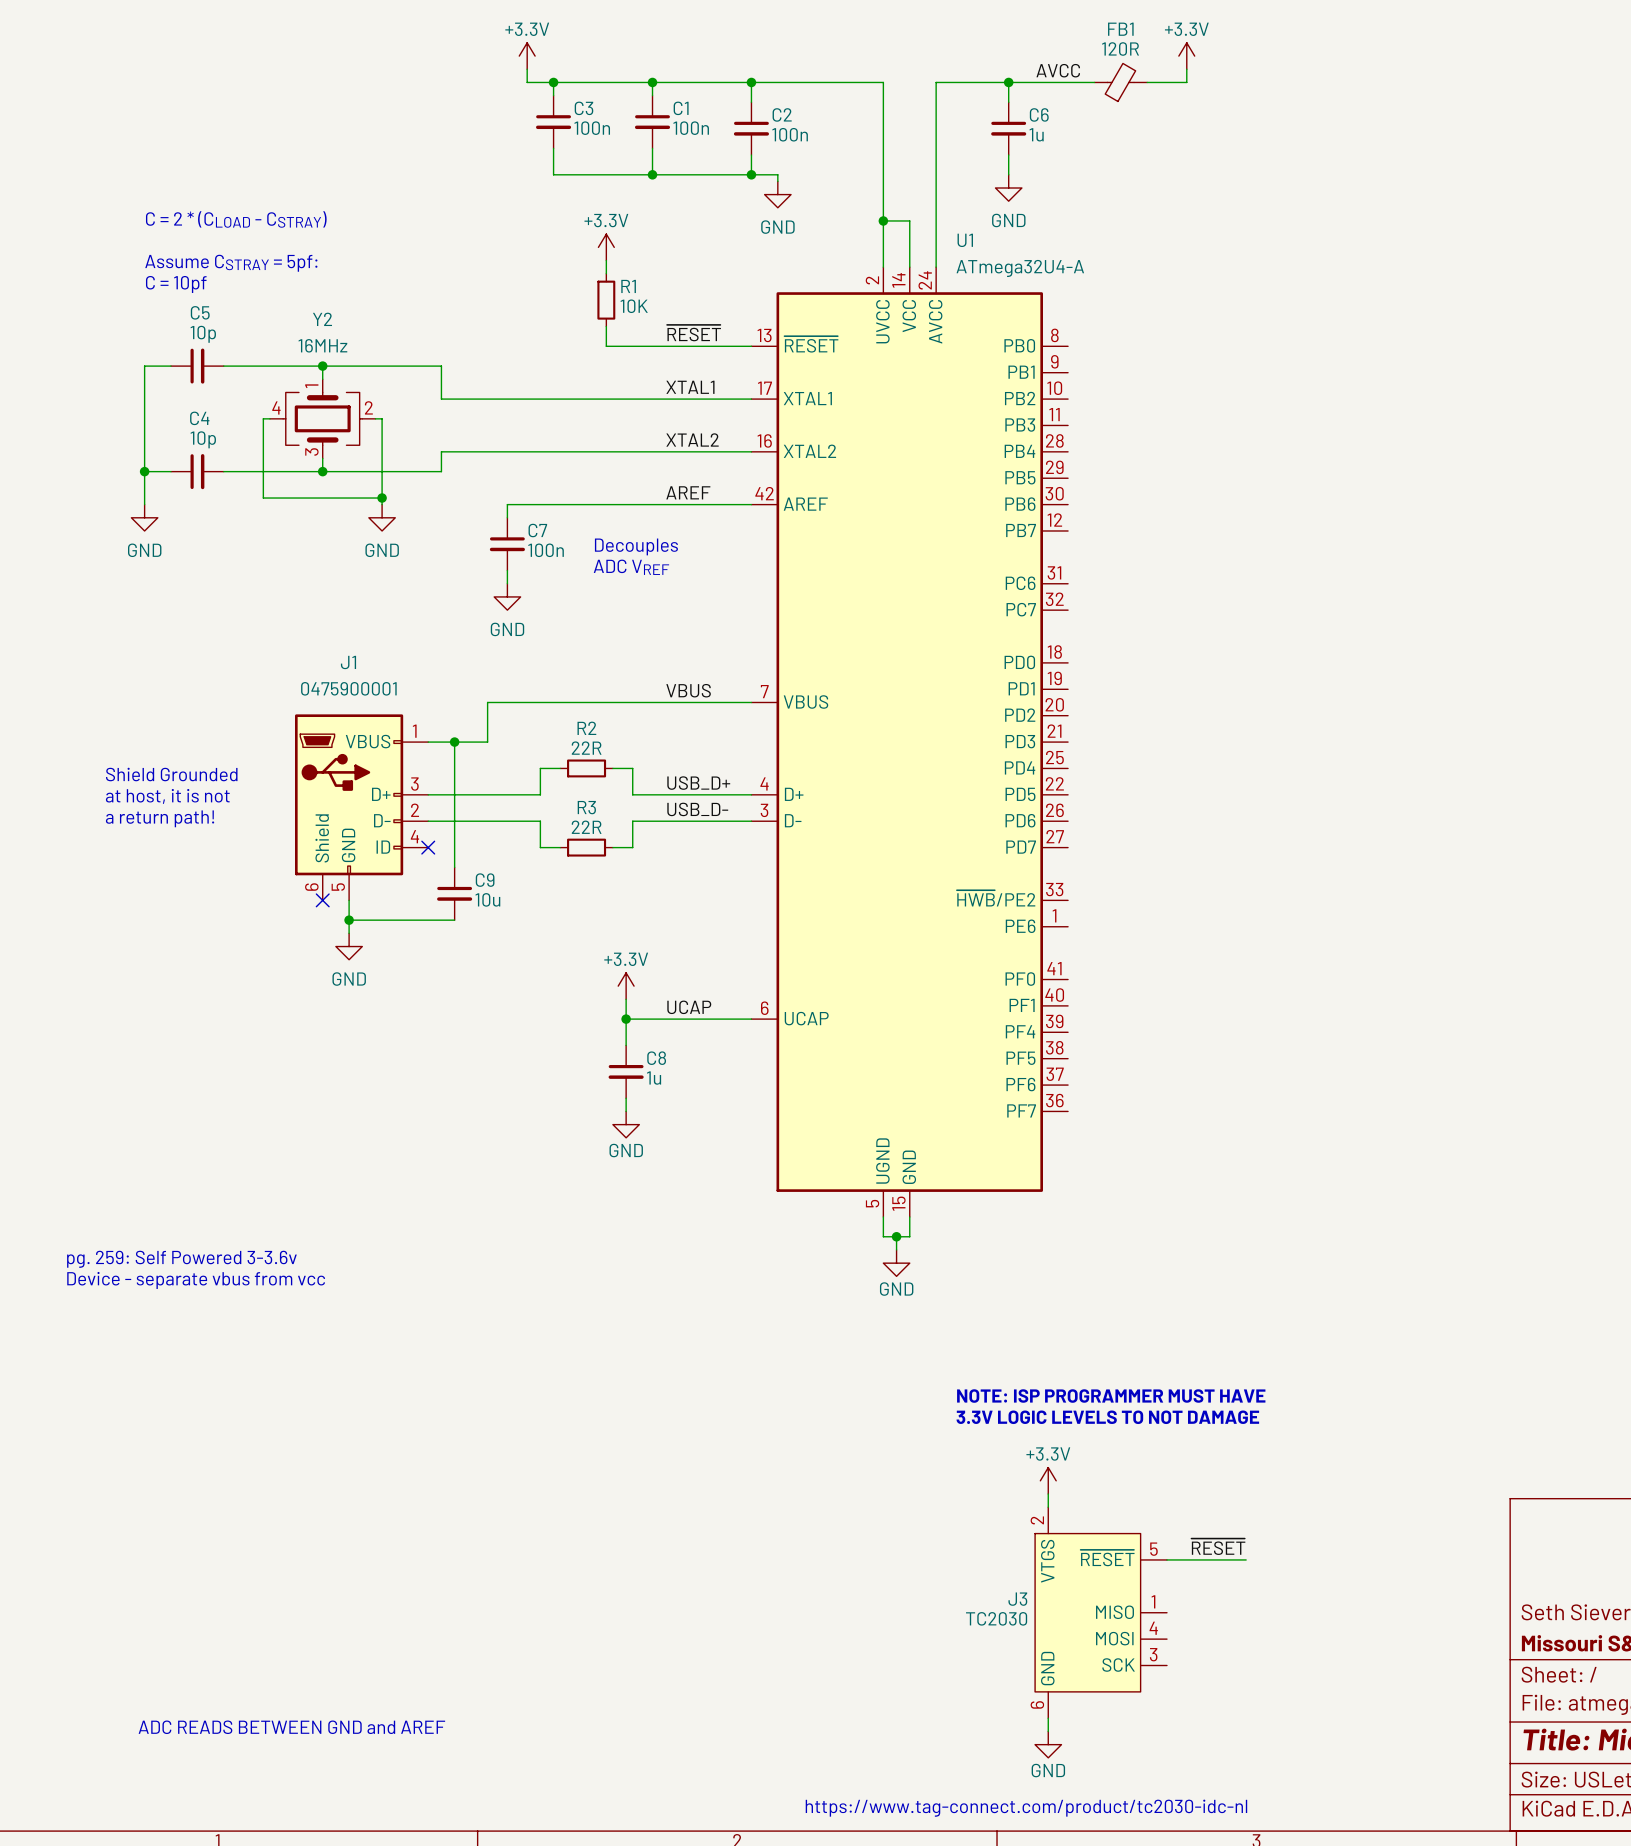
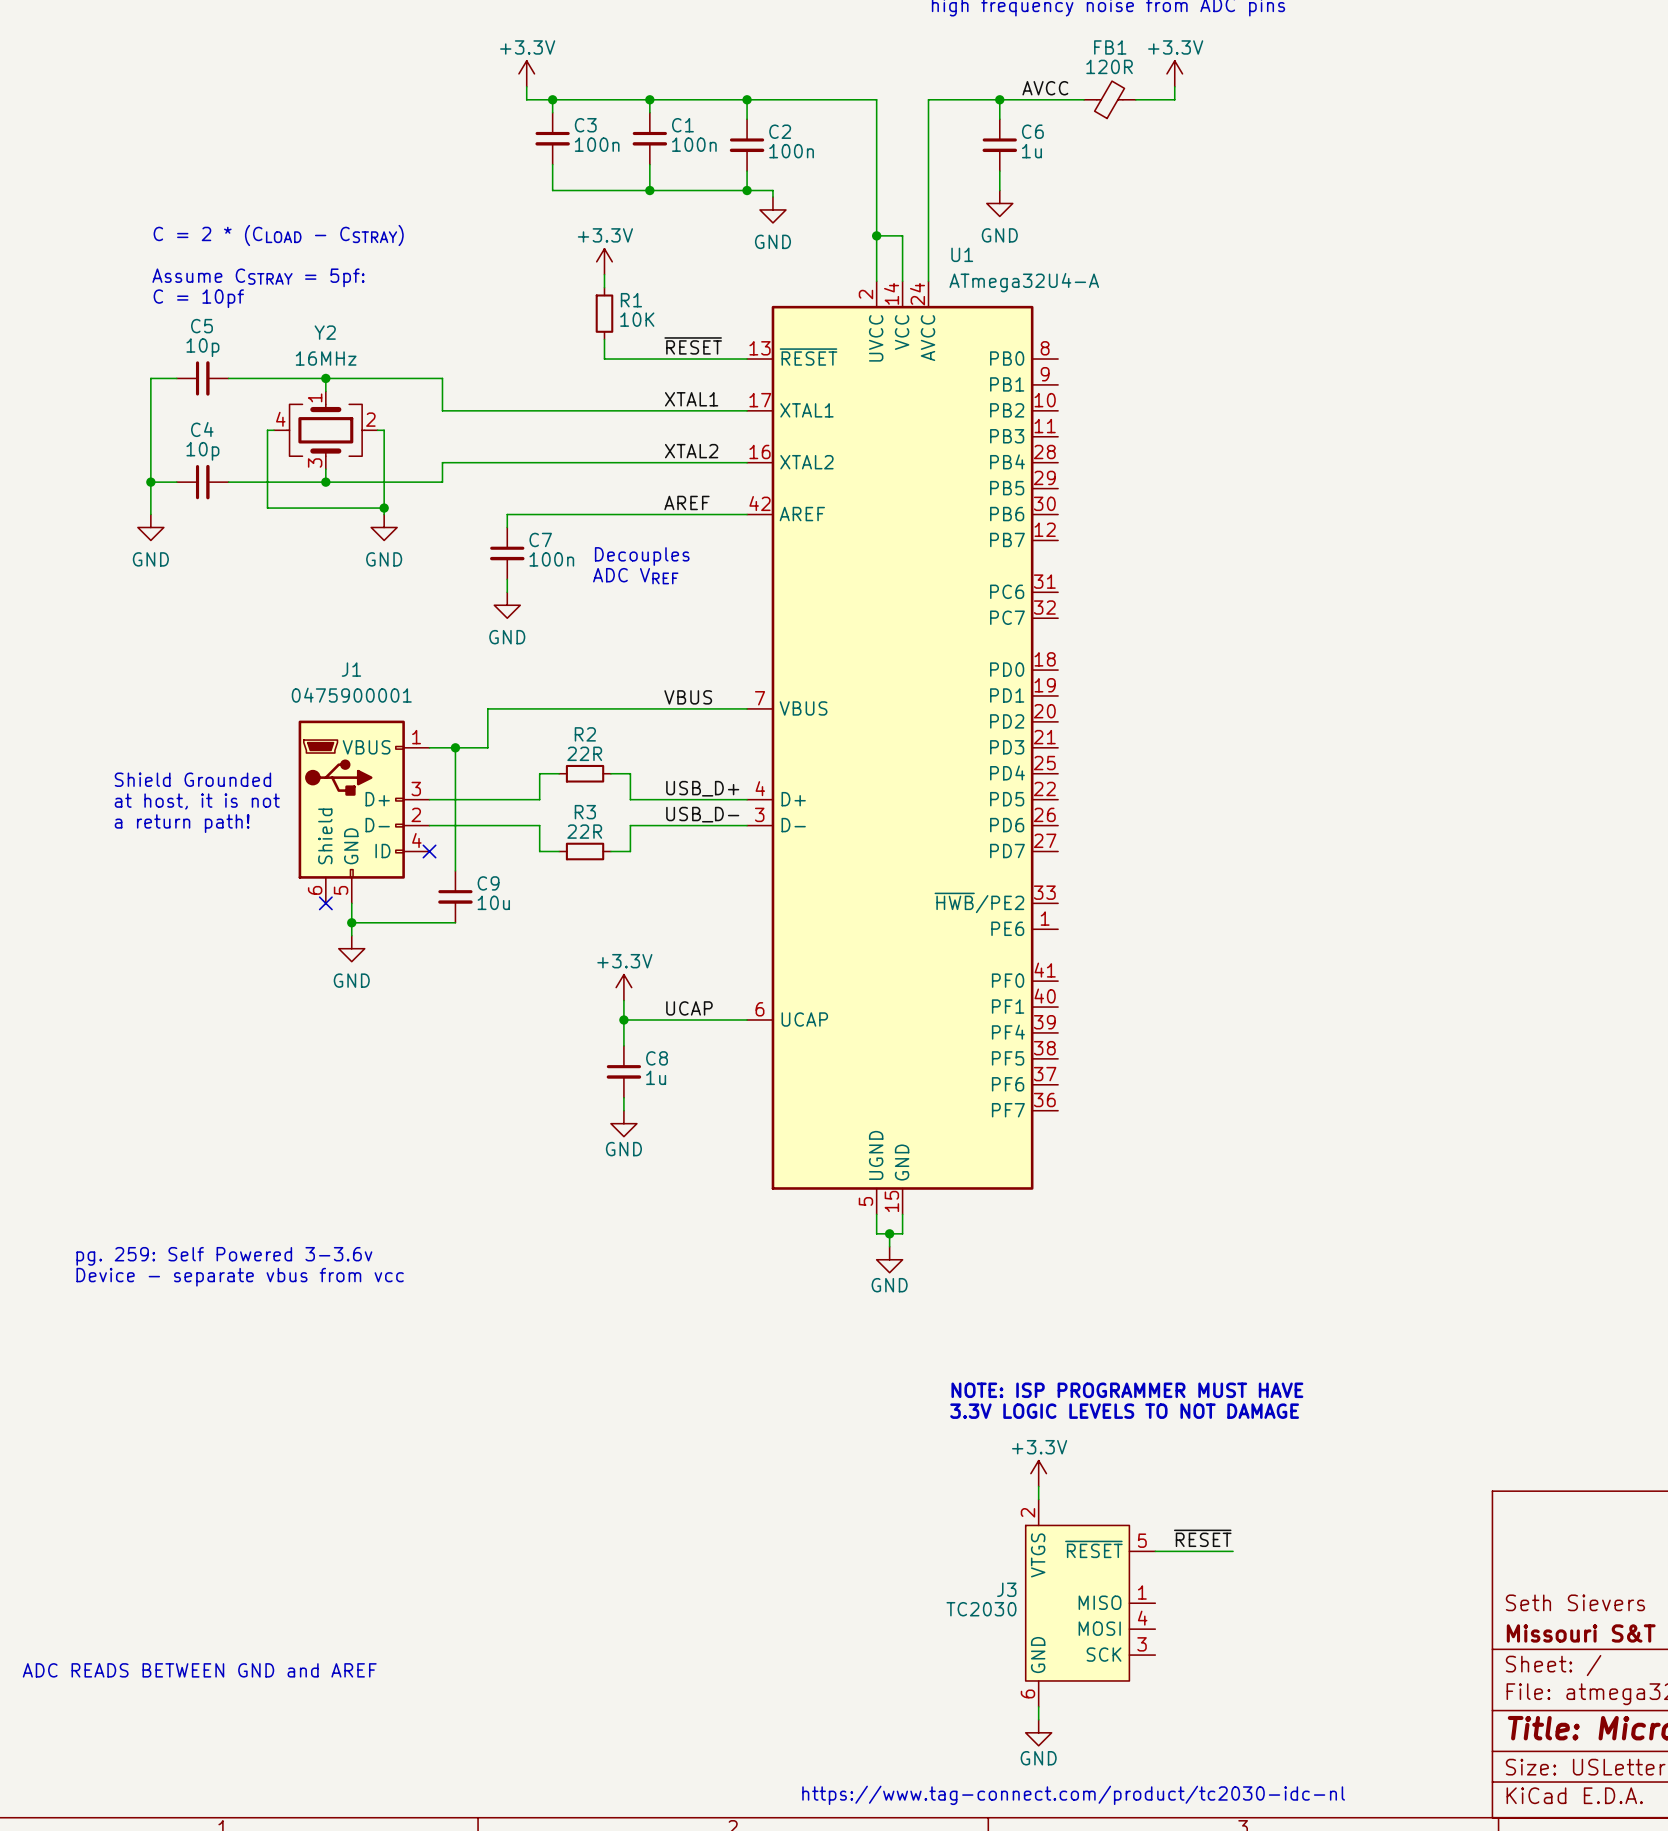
text position: ADC READS BETWEEN GND and AREF (291, 1727) -> ADC READS BETWEEN GND and AREF (199, 1670)

